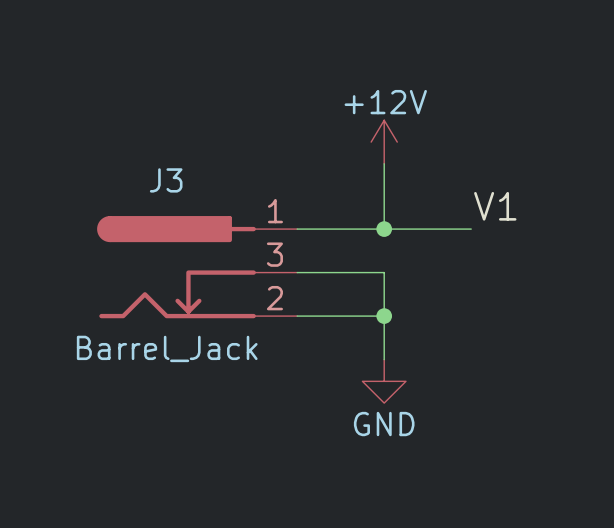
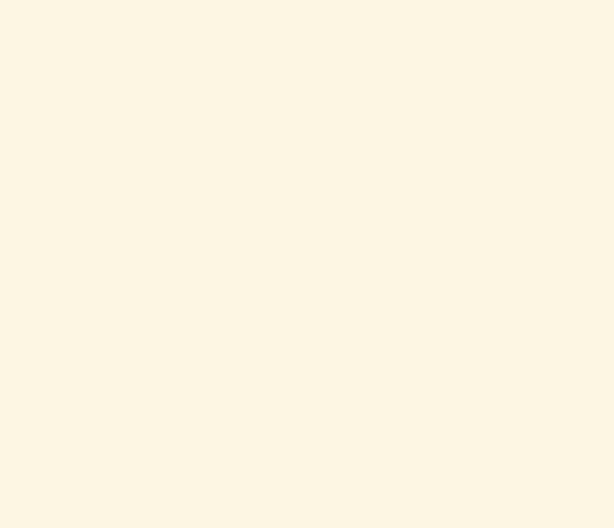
power symbol: +12V (384, 142) -> none
wire: (384, 163) (384, 229) -> none
label: V1 (495, 206) -> none
wire: (297, 229) (471, 229) -> none
junction: (384, 229) -> none
J3: Barrel_Jack (197, 267) -> none
wire: (297, 272) (384, 272) (384, 359) -> none
wire: (297, 316) (384, 316) -> none
junction: (384, 316) -> none
power symbol: GND (384, 381) -> none

